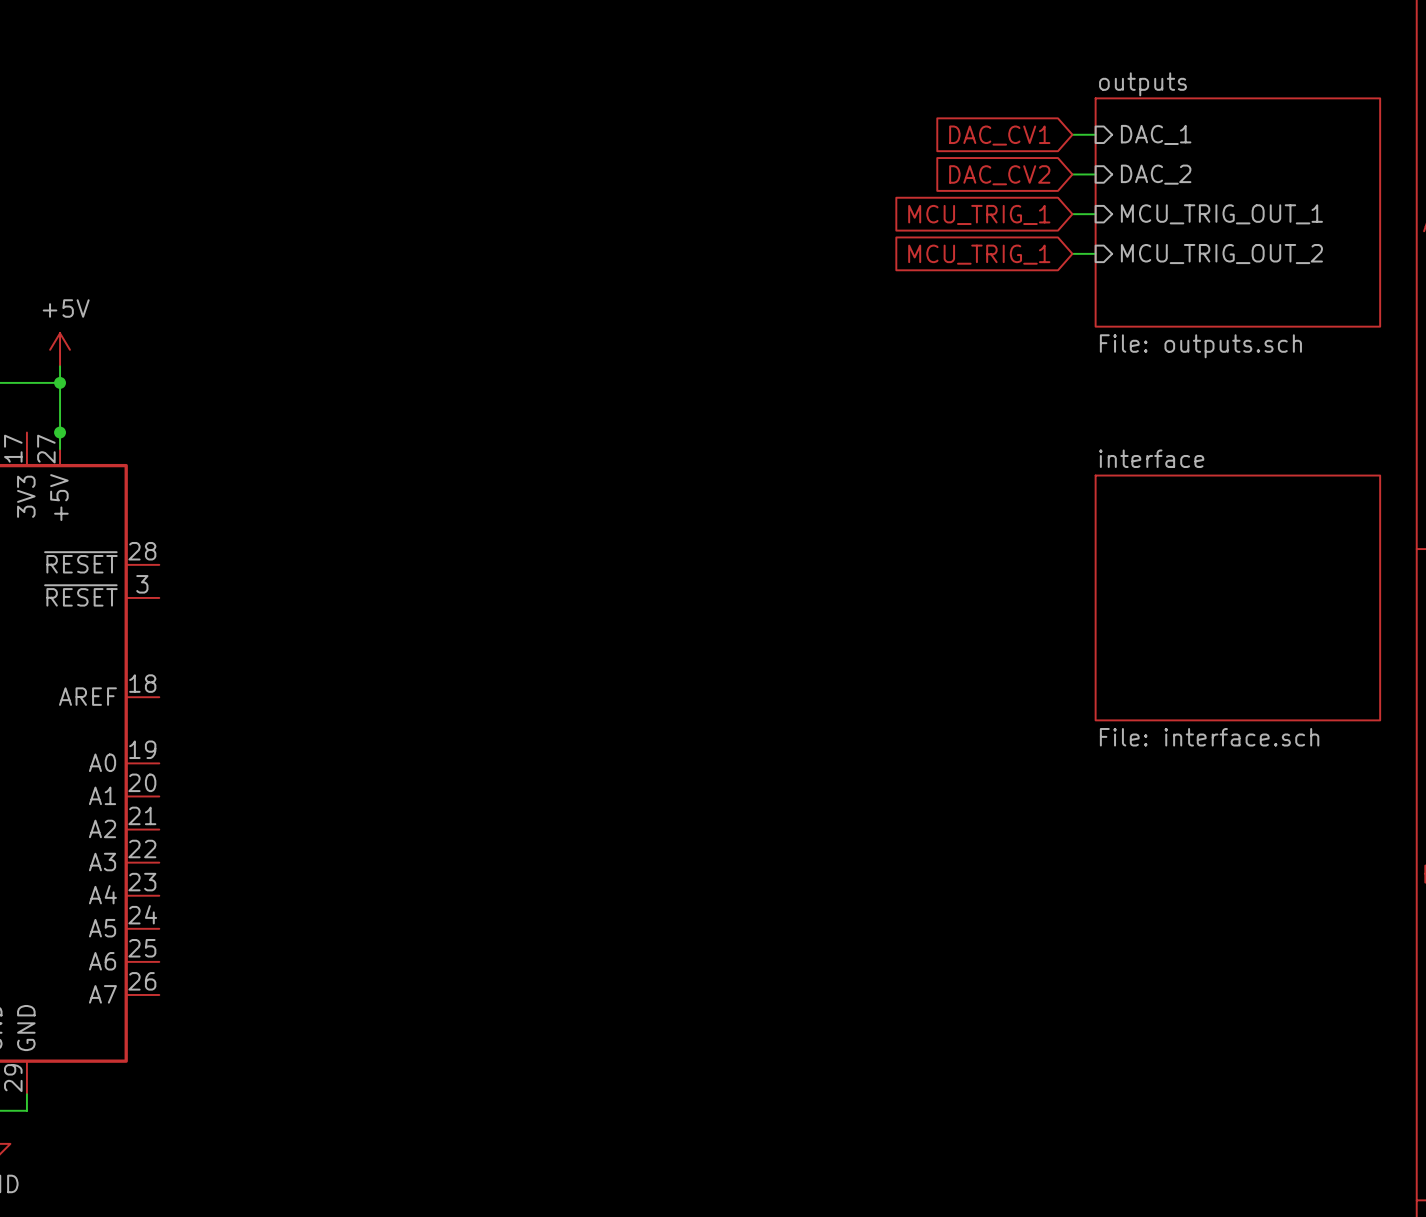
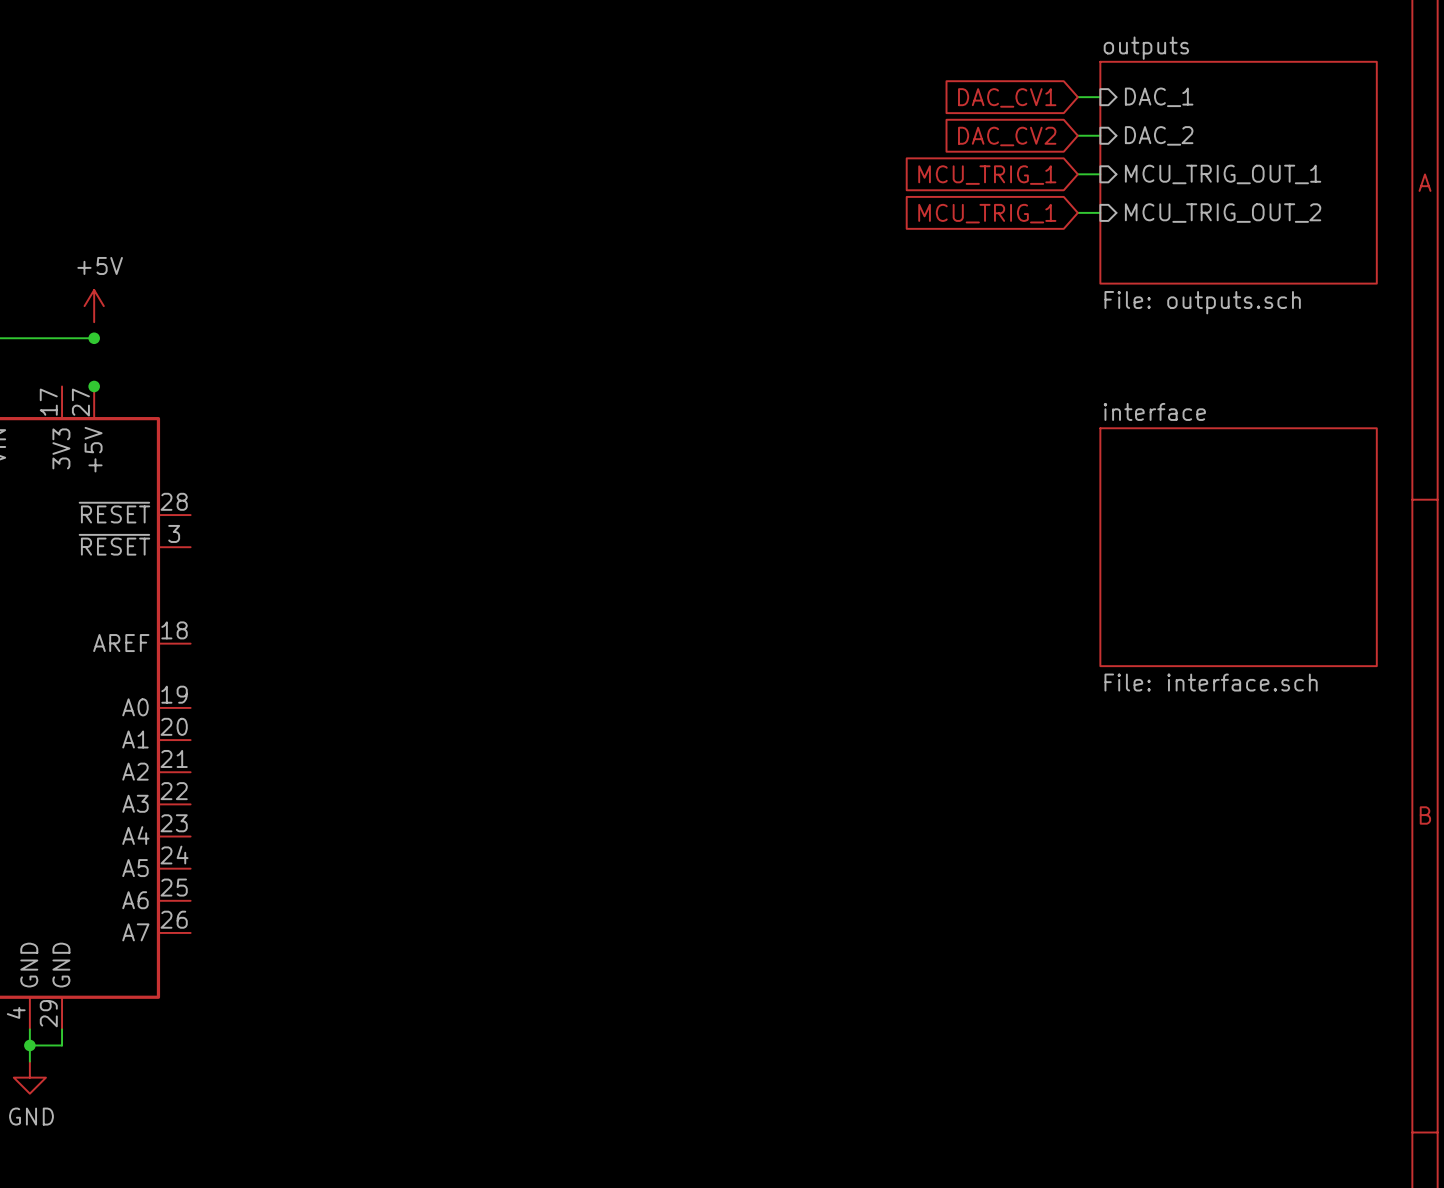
wire: (60, 366) (60, 449) -> none

